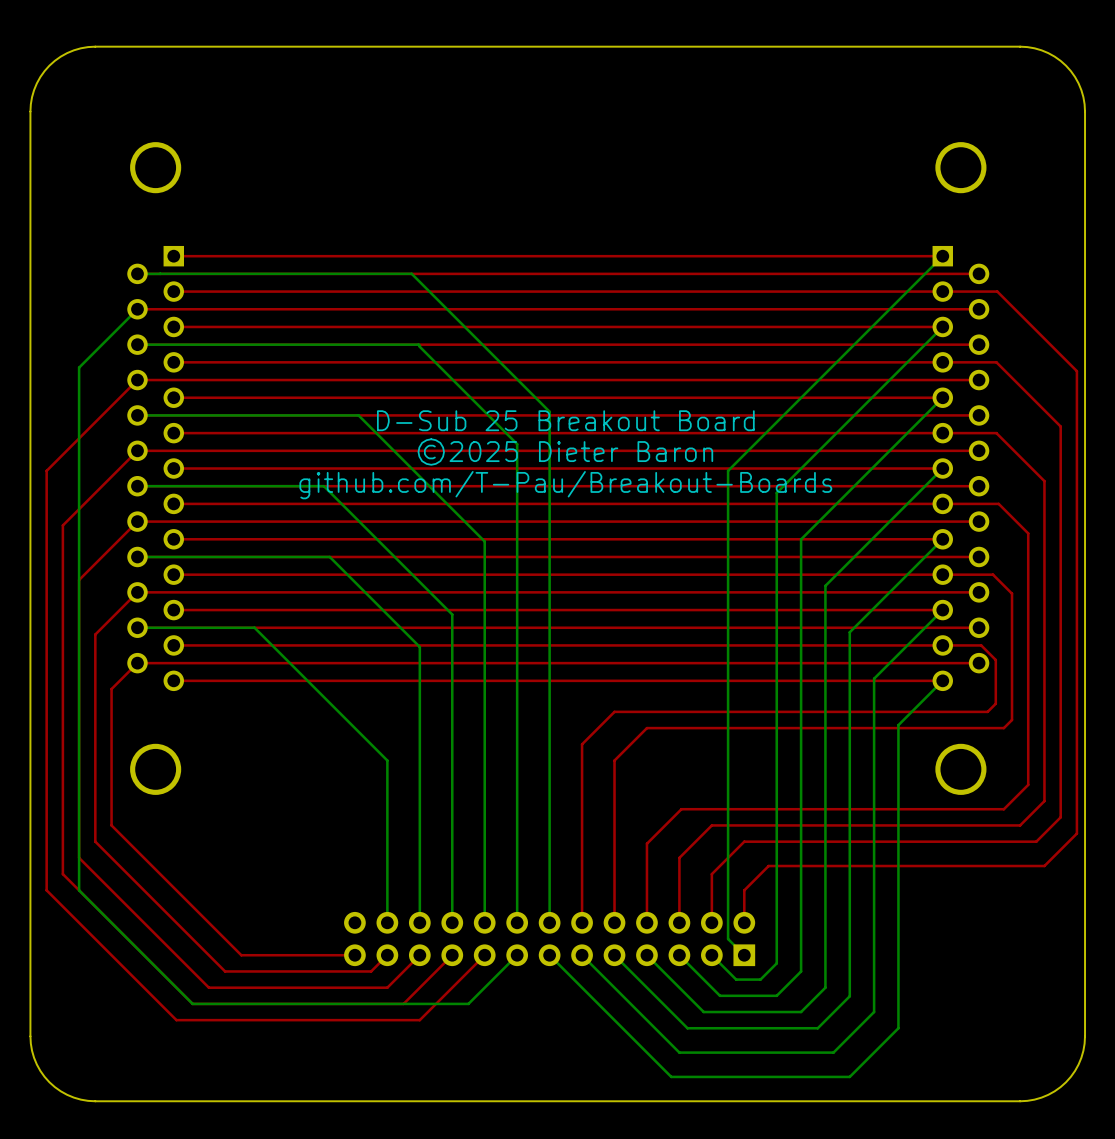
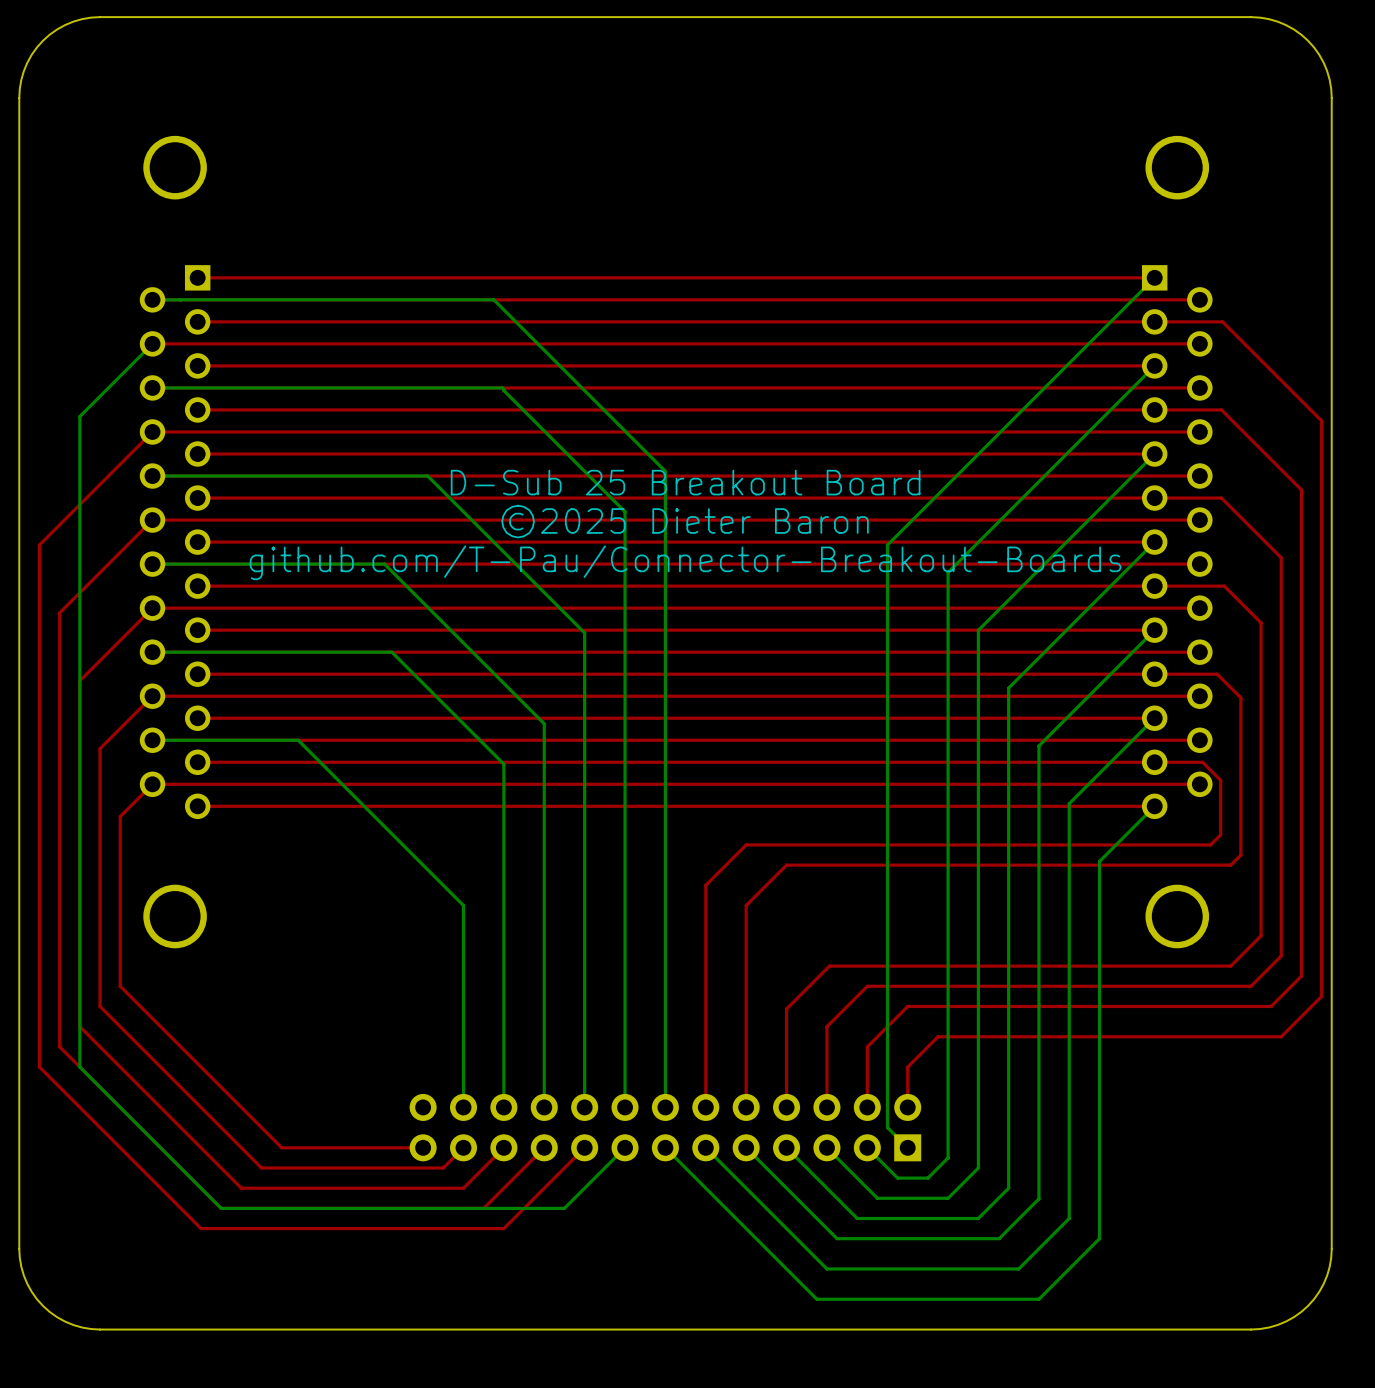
text: github.com/T-Pau/Breakout-Boards (565, 485) -> github.com/T-Pau/Connector-Breakout-Boards (685, 562)

